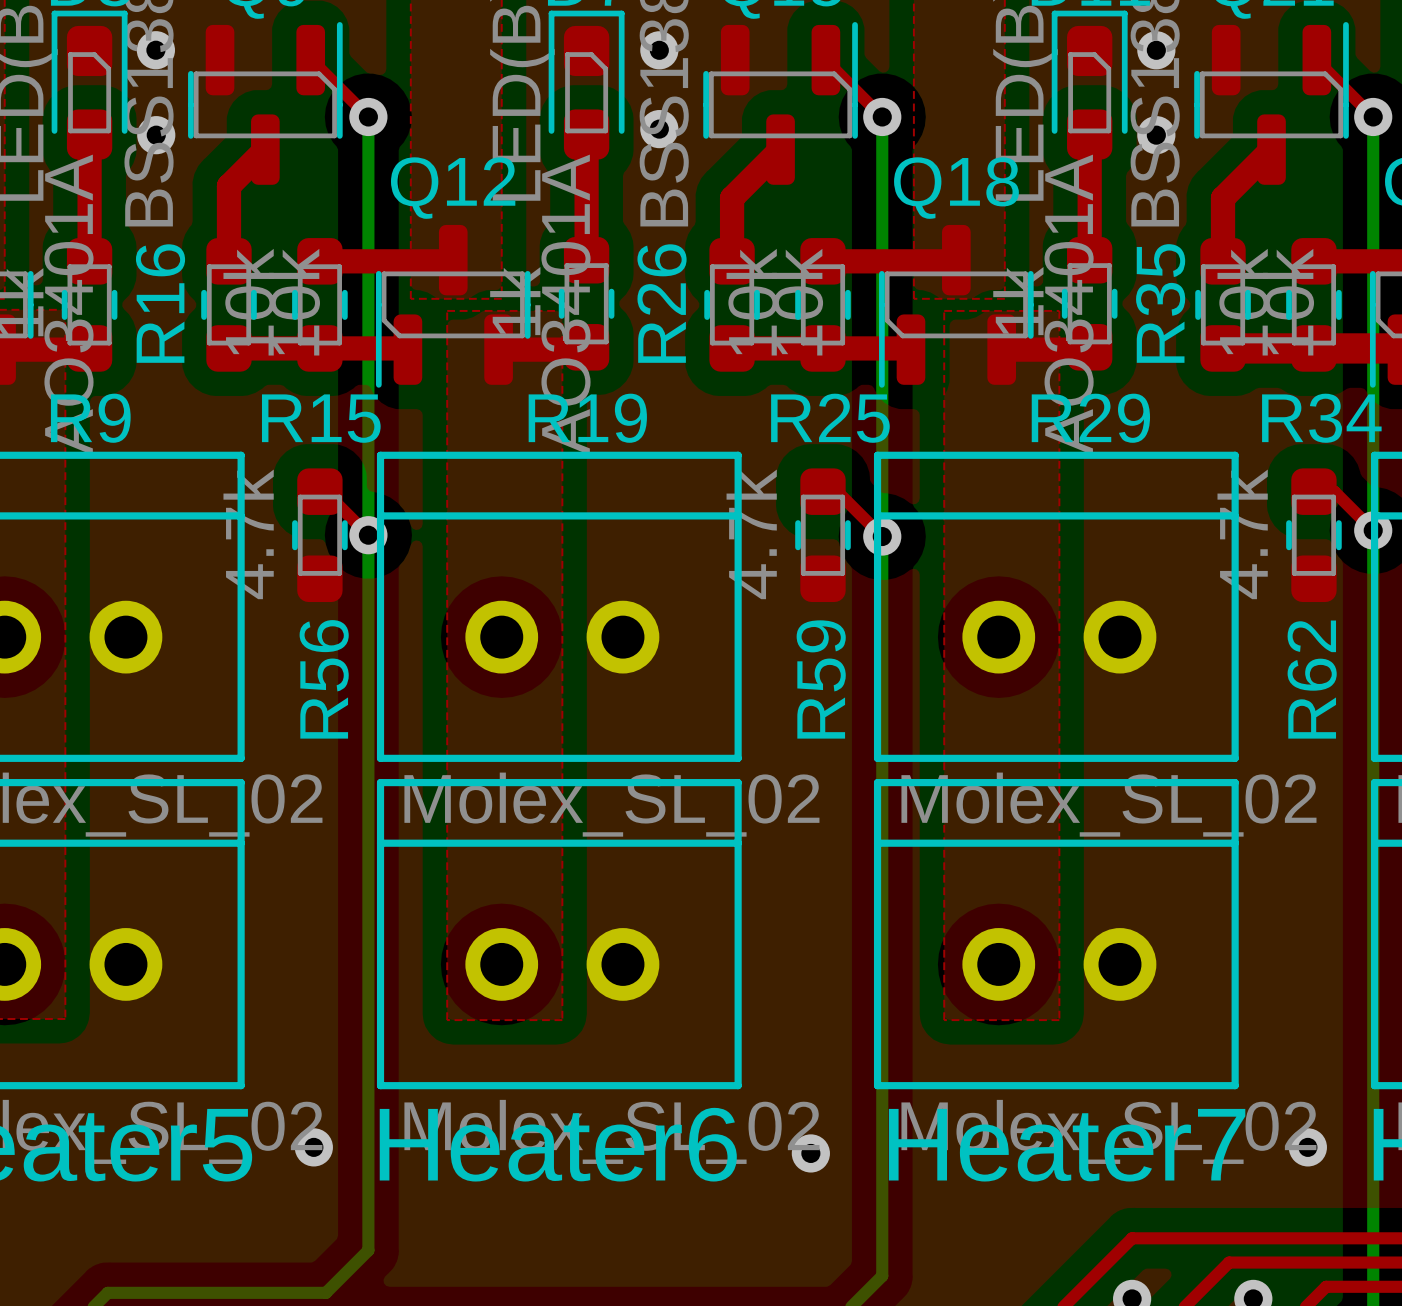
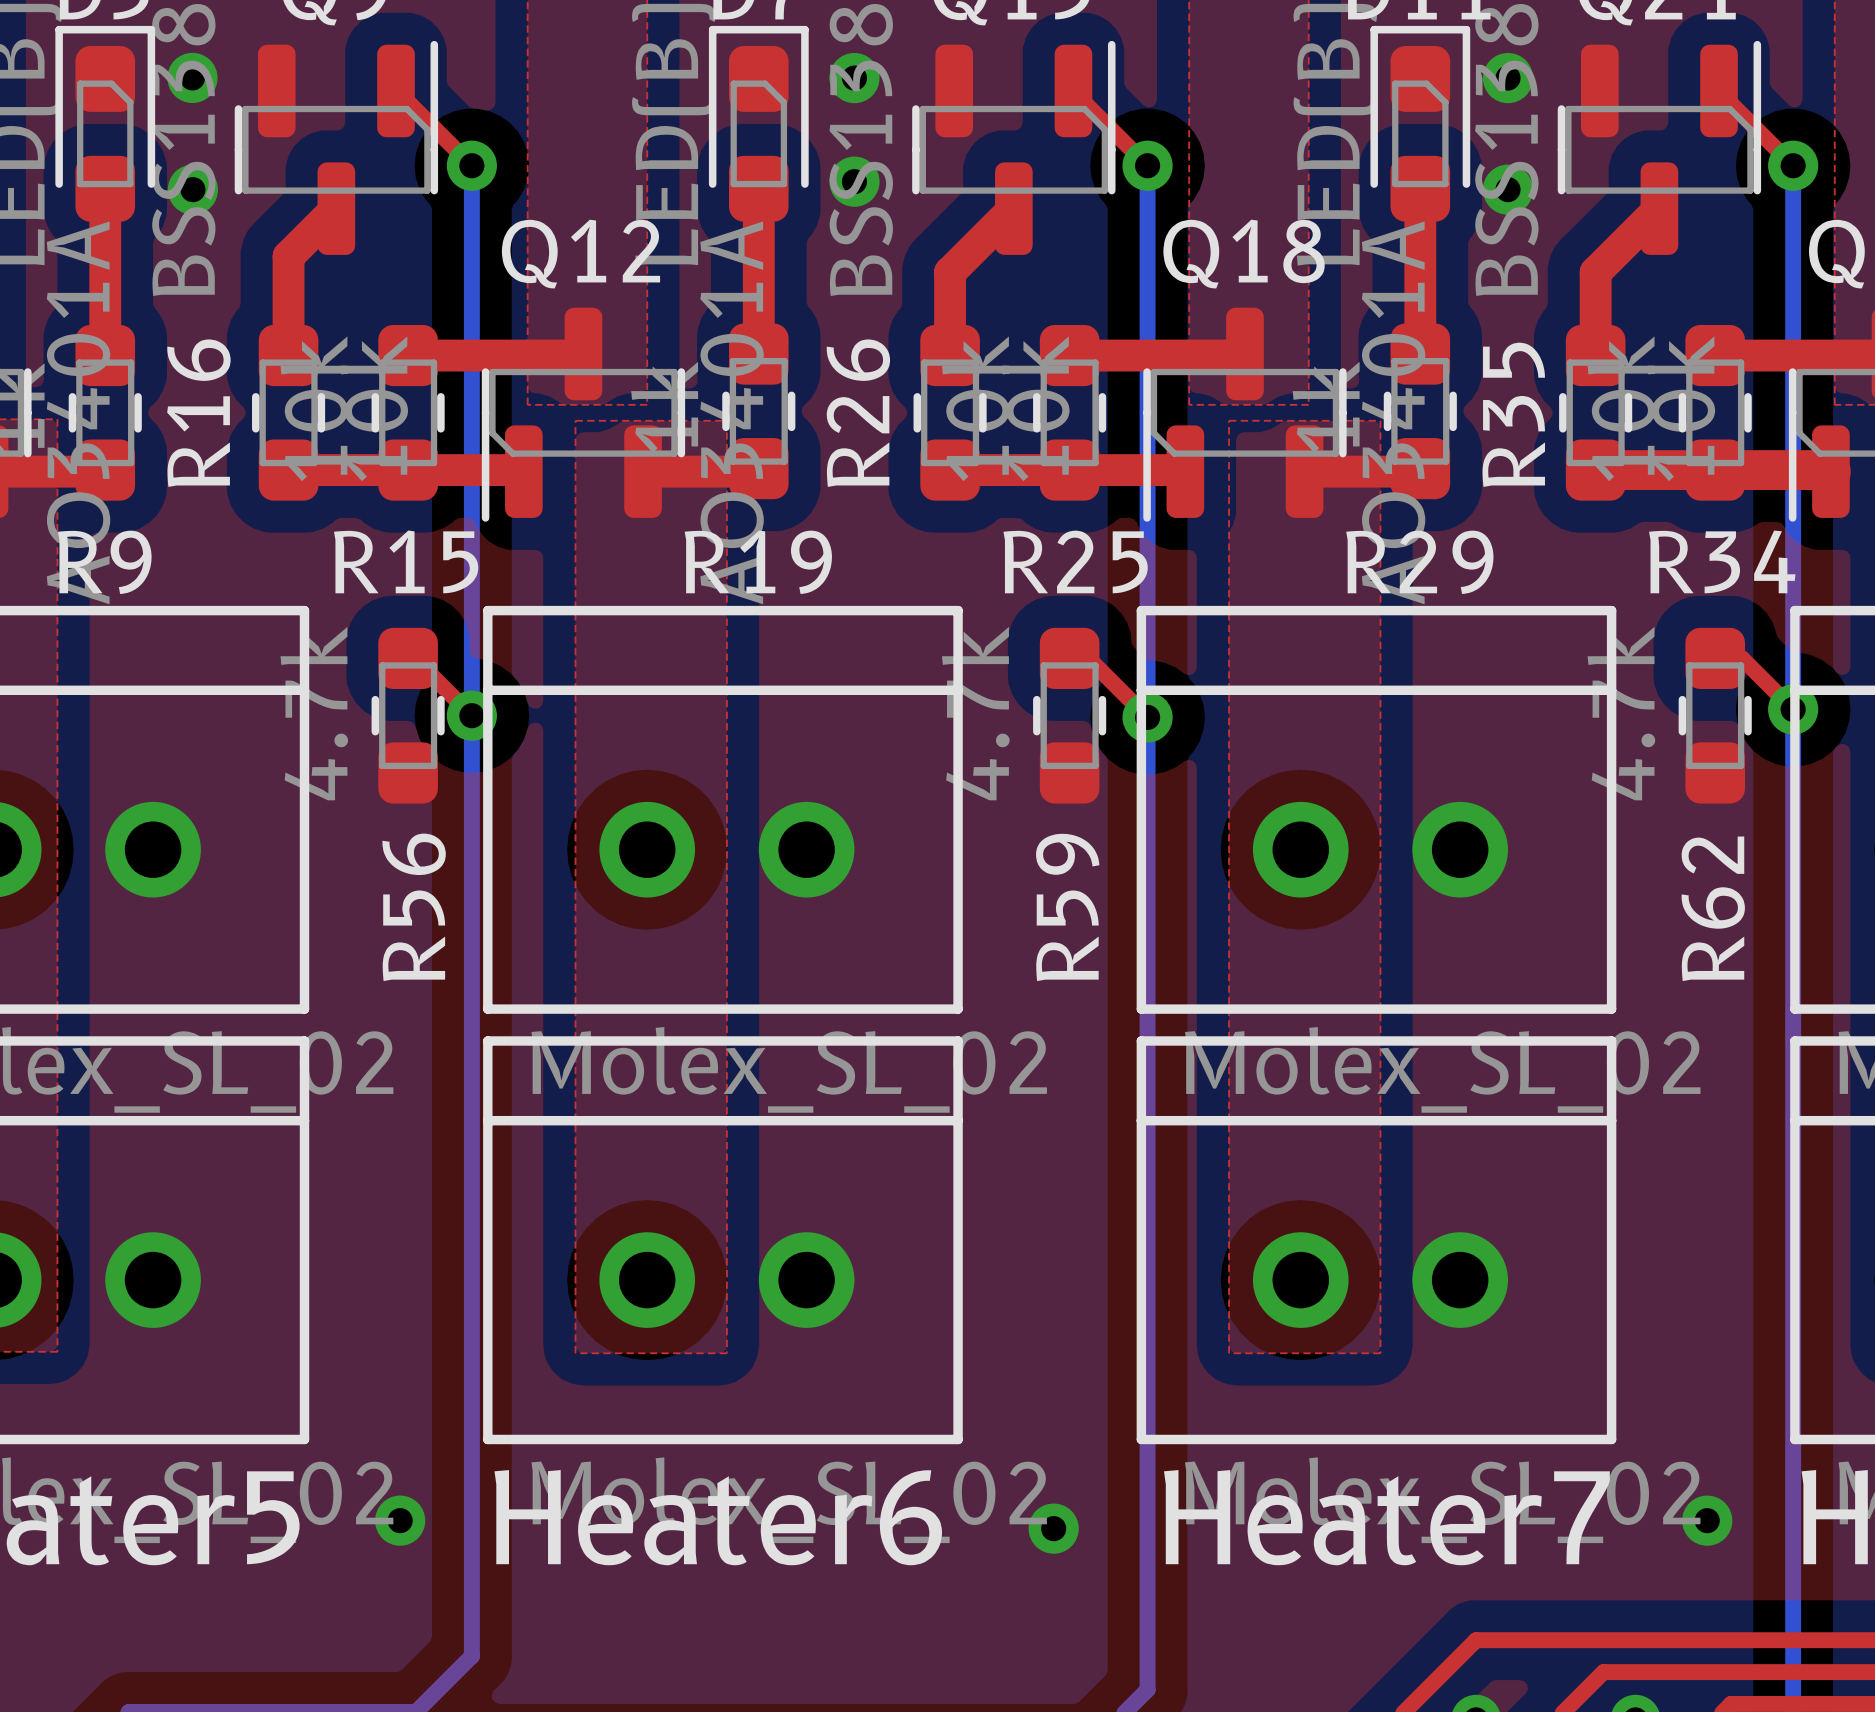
top zone outline: (53, 309) (65, 309) (65, 1018) (53, 1018) -> (57, 419) (57, 1351)

